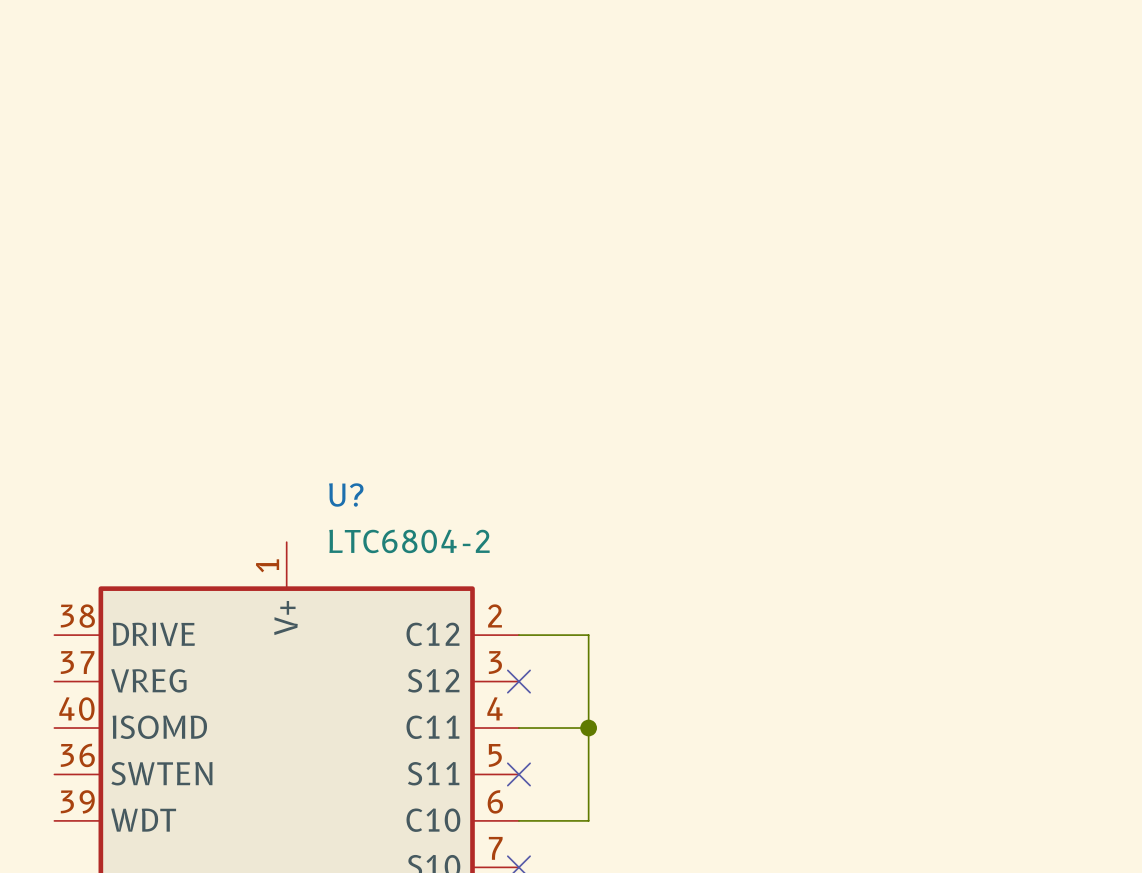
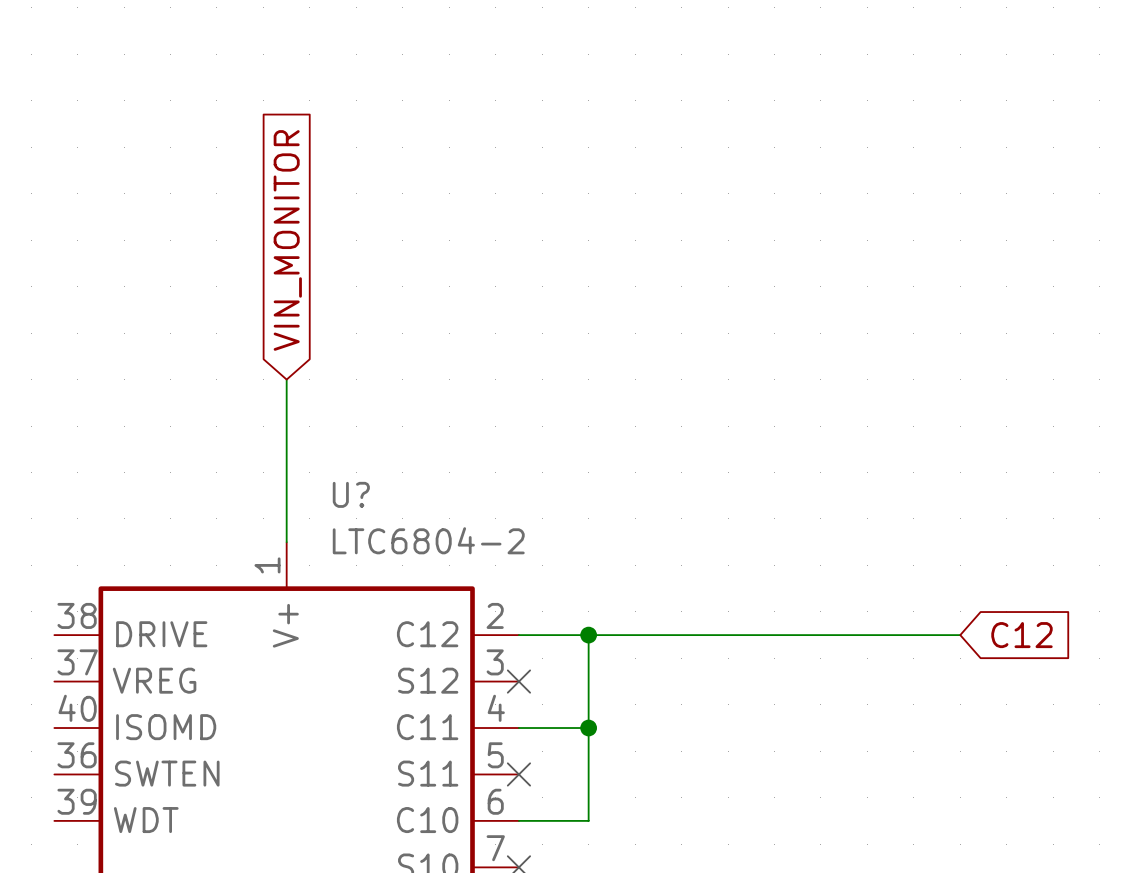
global label: none -> VIN_MONITOR (287, 240)
wire: none -> (286, 379) (286, 542)
wire: none -> (588, 635) (960, 635)
junction: none -> (588, 635)
global label: none -> C12 (1021, 635)

